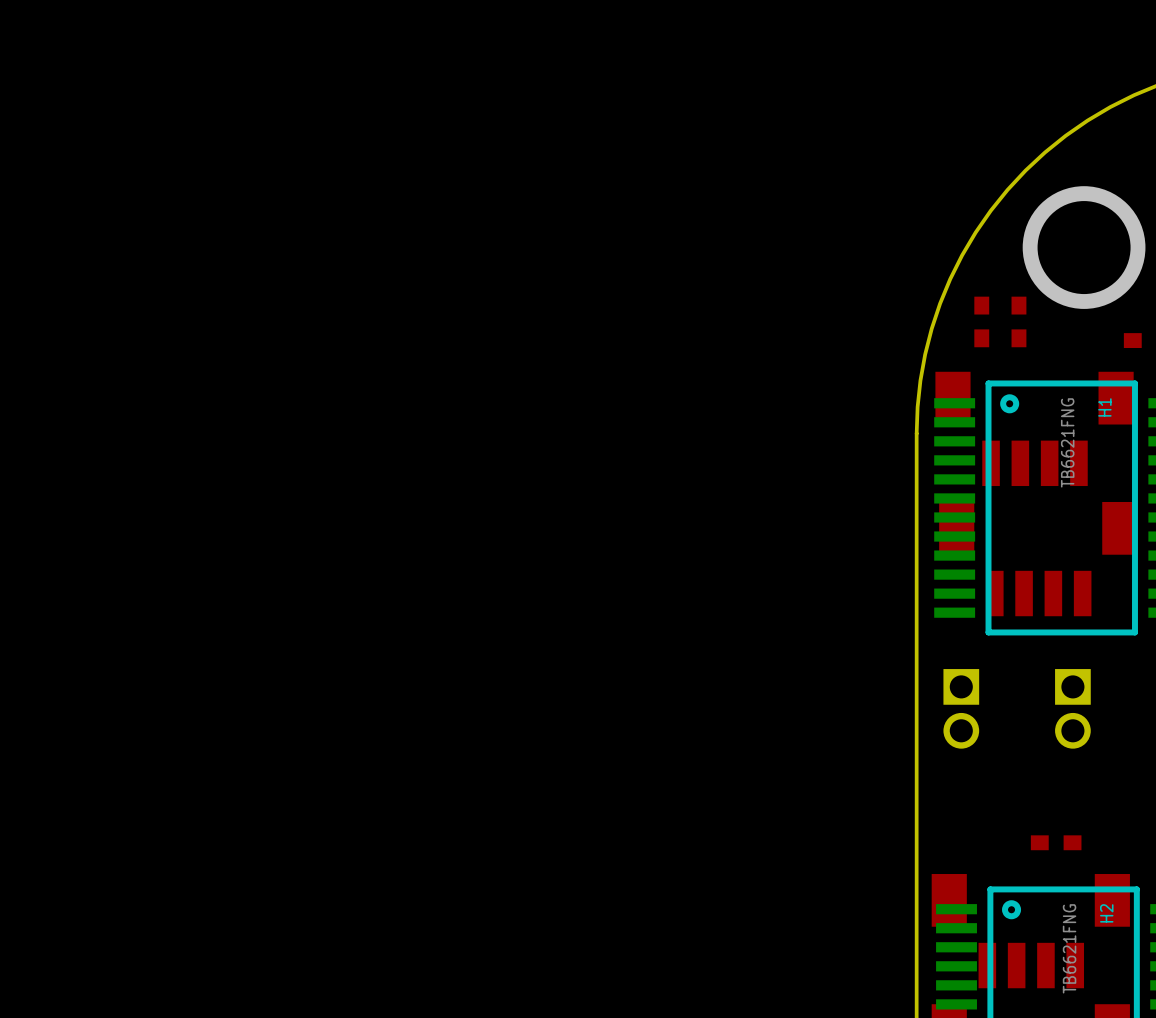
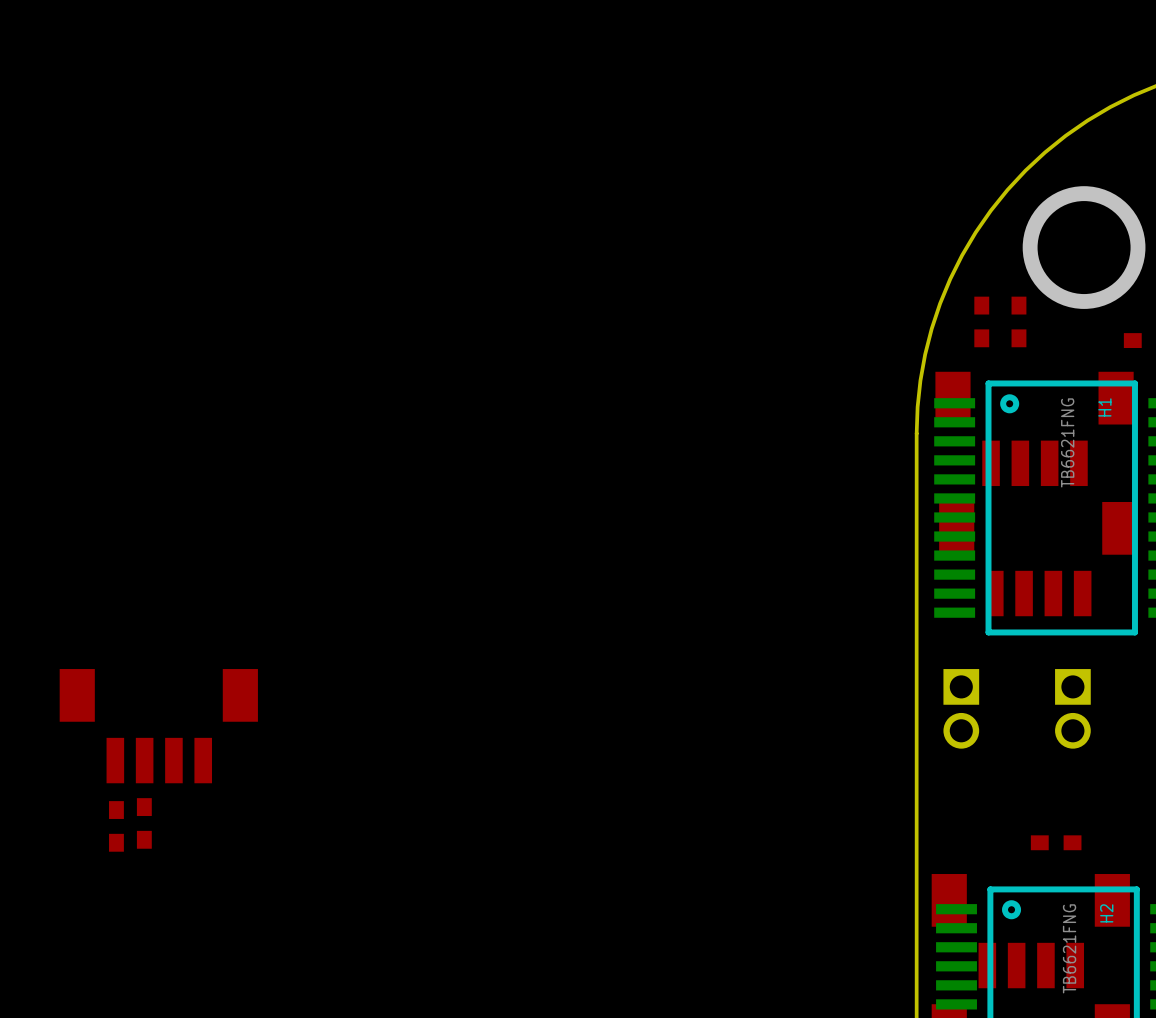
part: none -> (158, 726)
part: none -> (144, 823)
part: none -> (116, 826)

